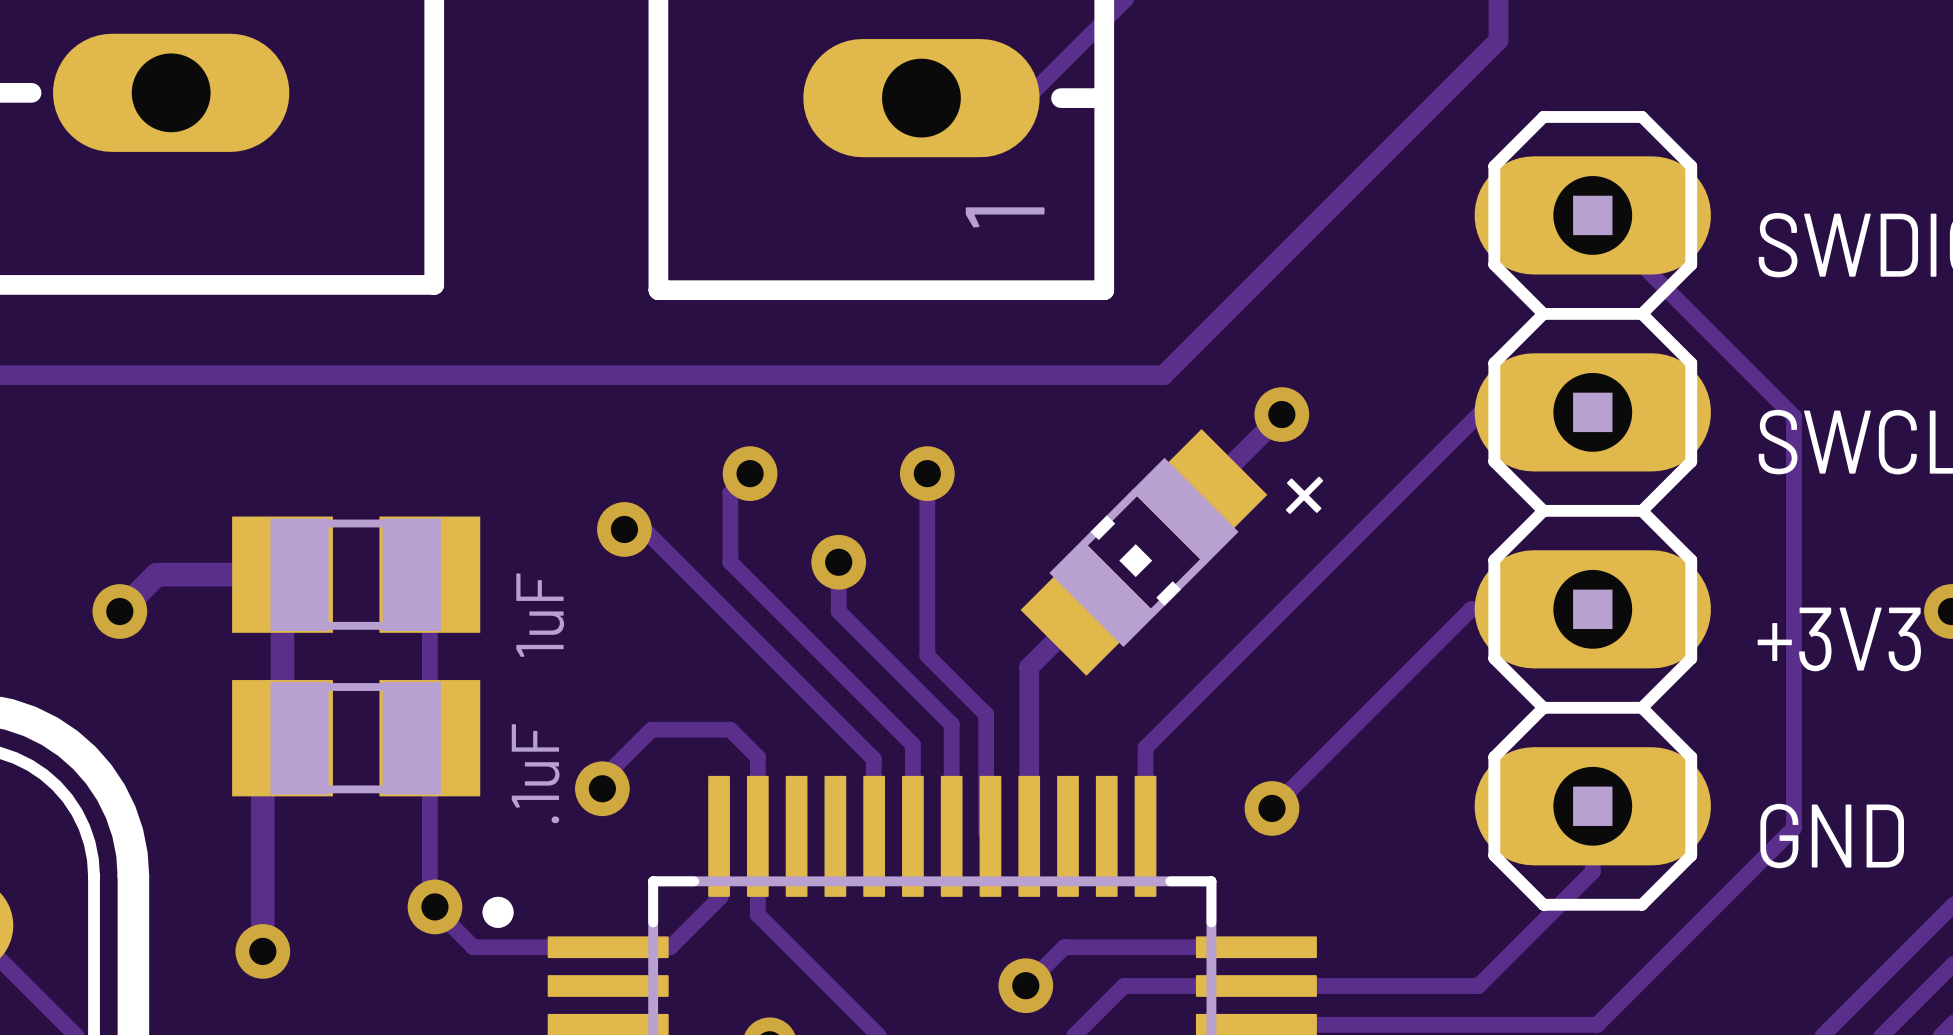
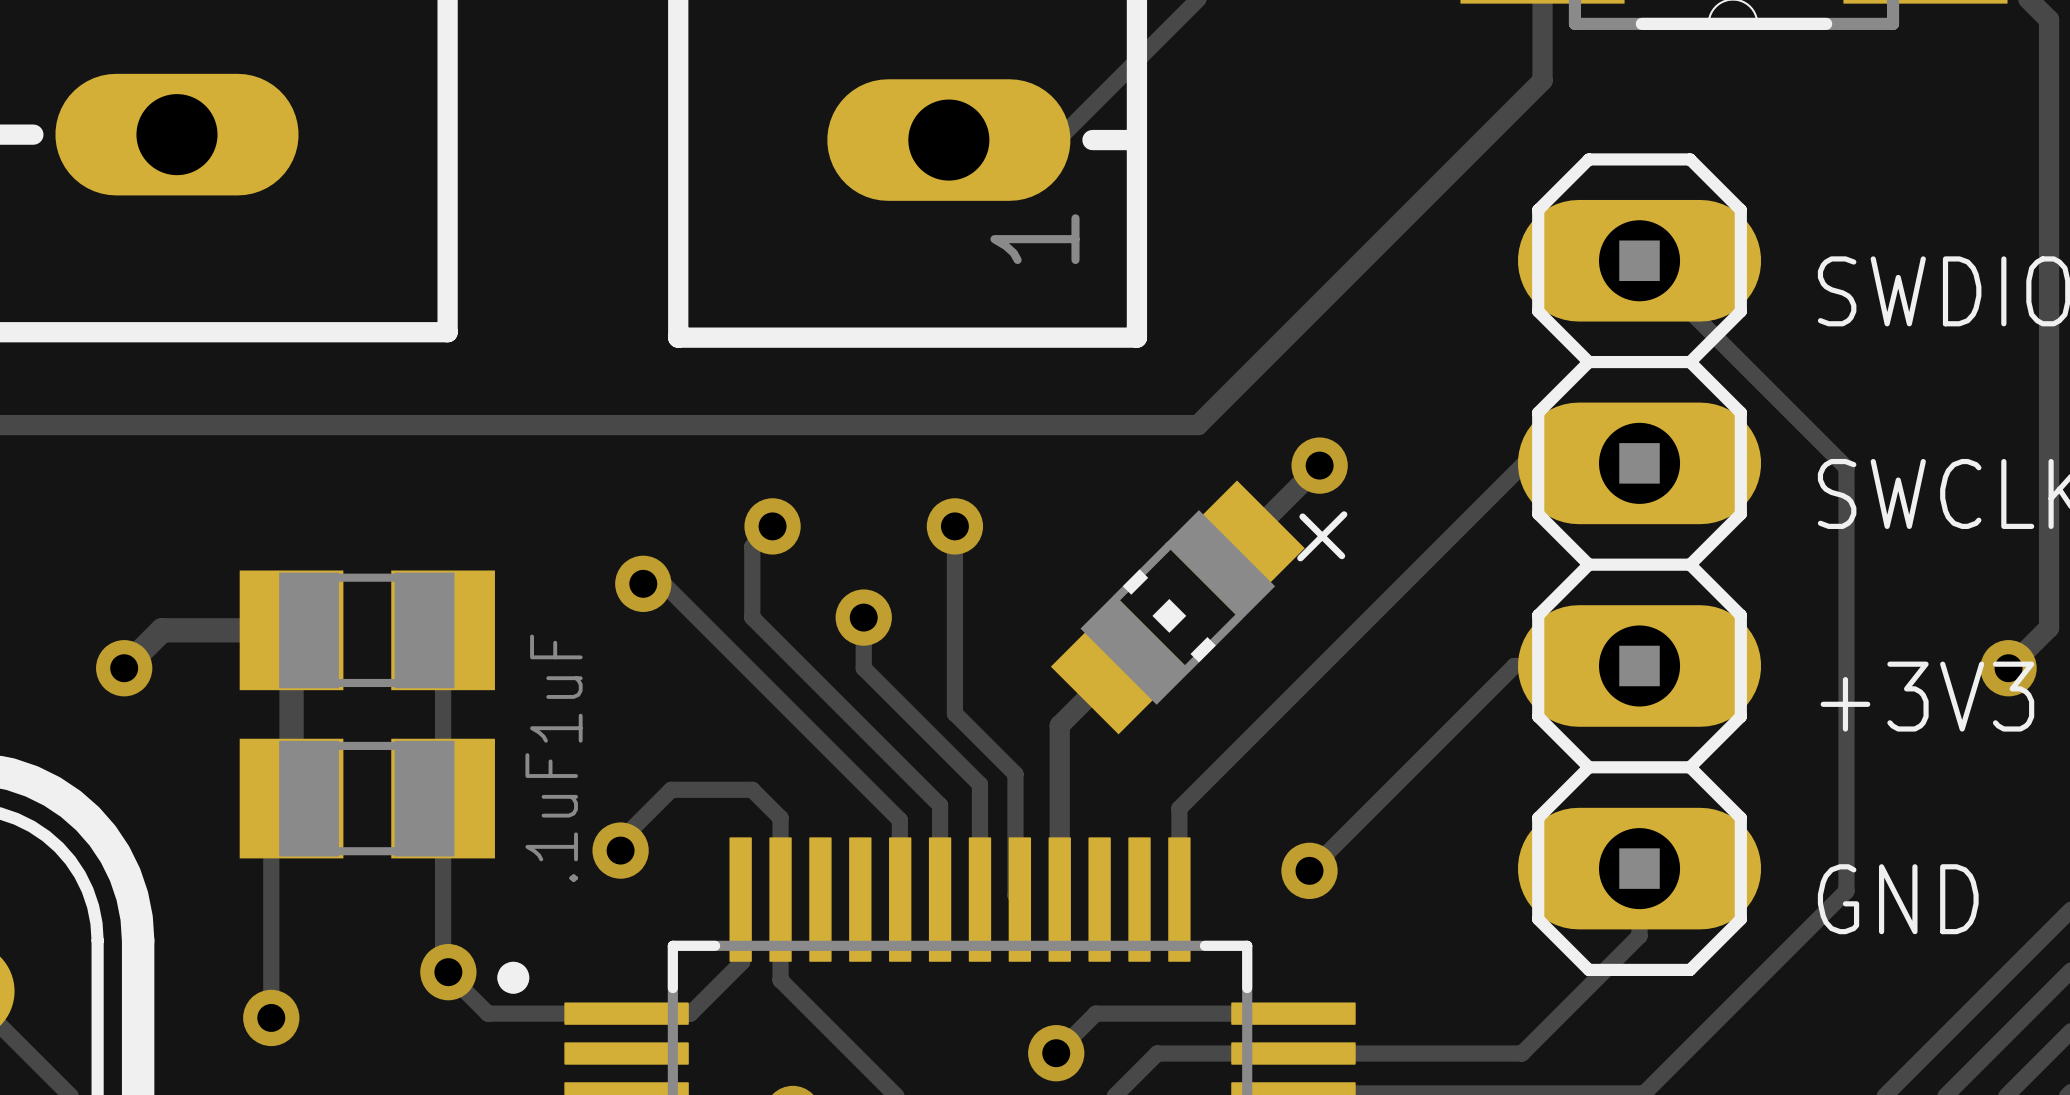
track width: thick (262, 757) (262, 951) -> thin (271, 818) (271, 1017)

